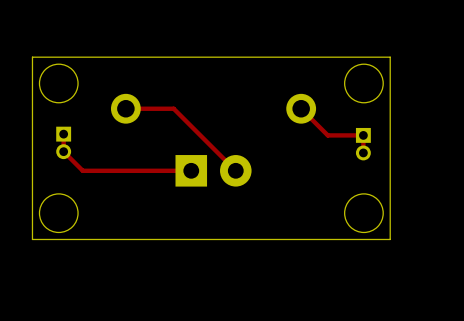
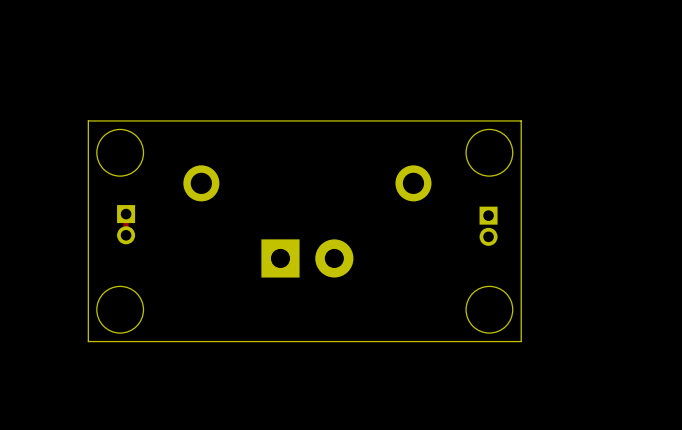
top track: (125, 108) (173, 108) (235, 170) -> none
top track: (301, 108) (327, 135) (363, 135) (363, 152) -> none
top track: (63, 151) (82, 170) (191, 170) -> none

